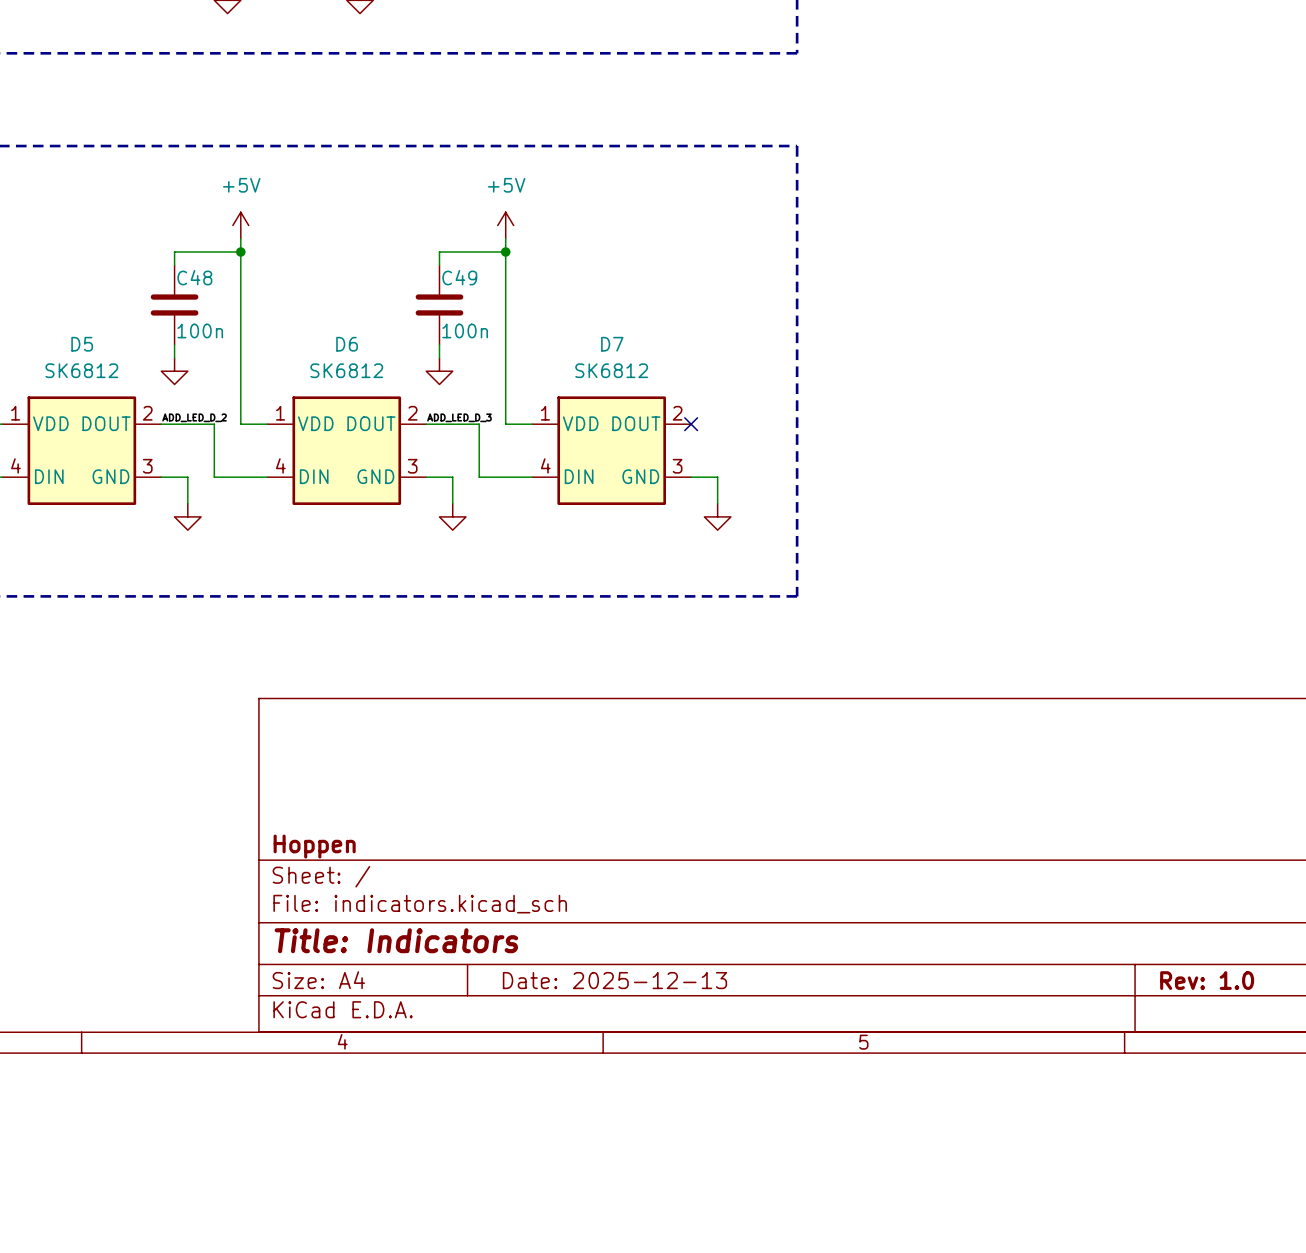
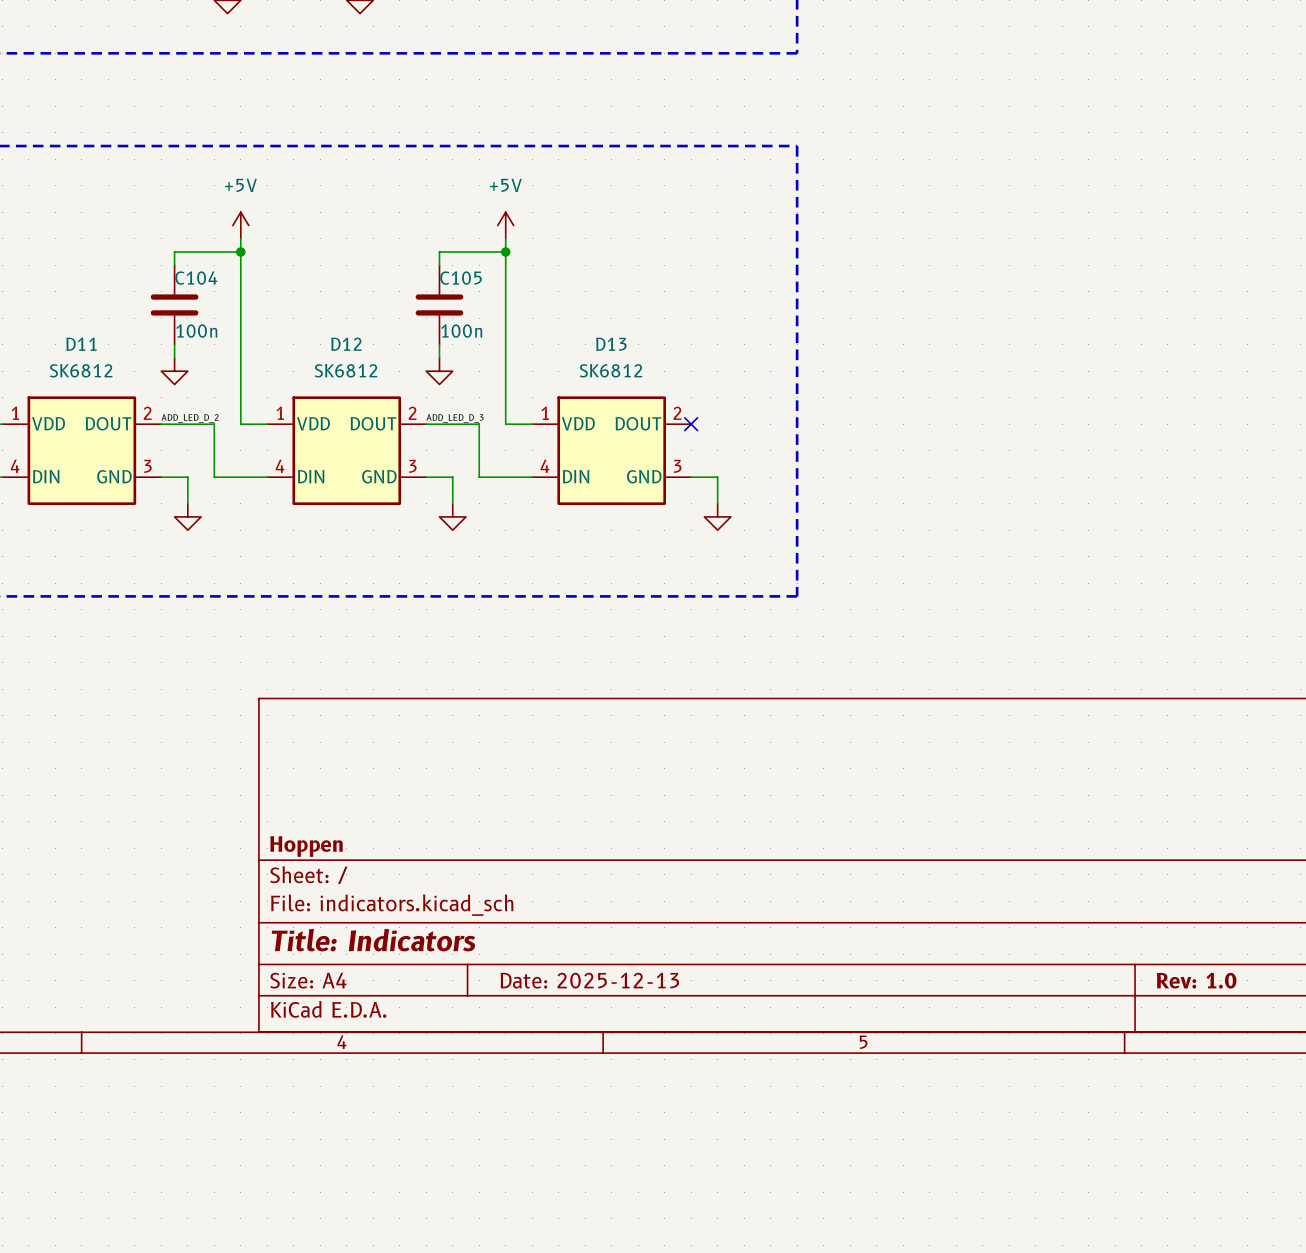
C48 name: C48 (194, 277) -> C104 (196, 278)
C49 name: C49 (459, 277) -> C105 (461, 278)
D5 name: D5 (82, 344) -> D11 (81, 344)
D6 name: D6 (347, 344) -> D12 (346, 344)
D7 name: D7 (612, 344) -> D13 (611, 344)

